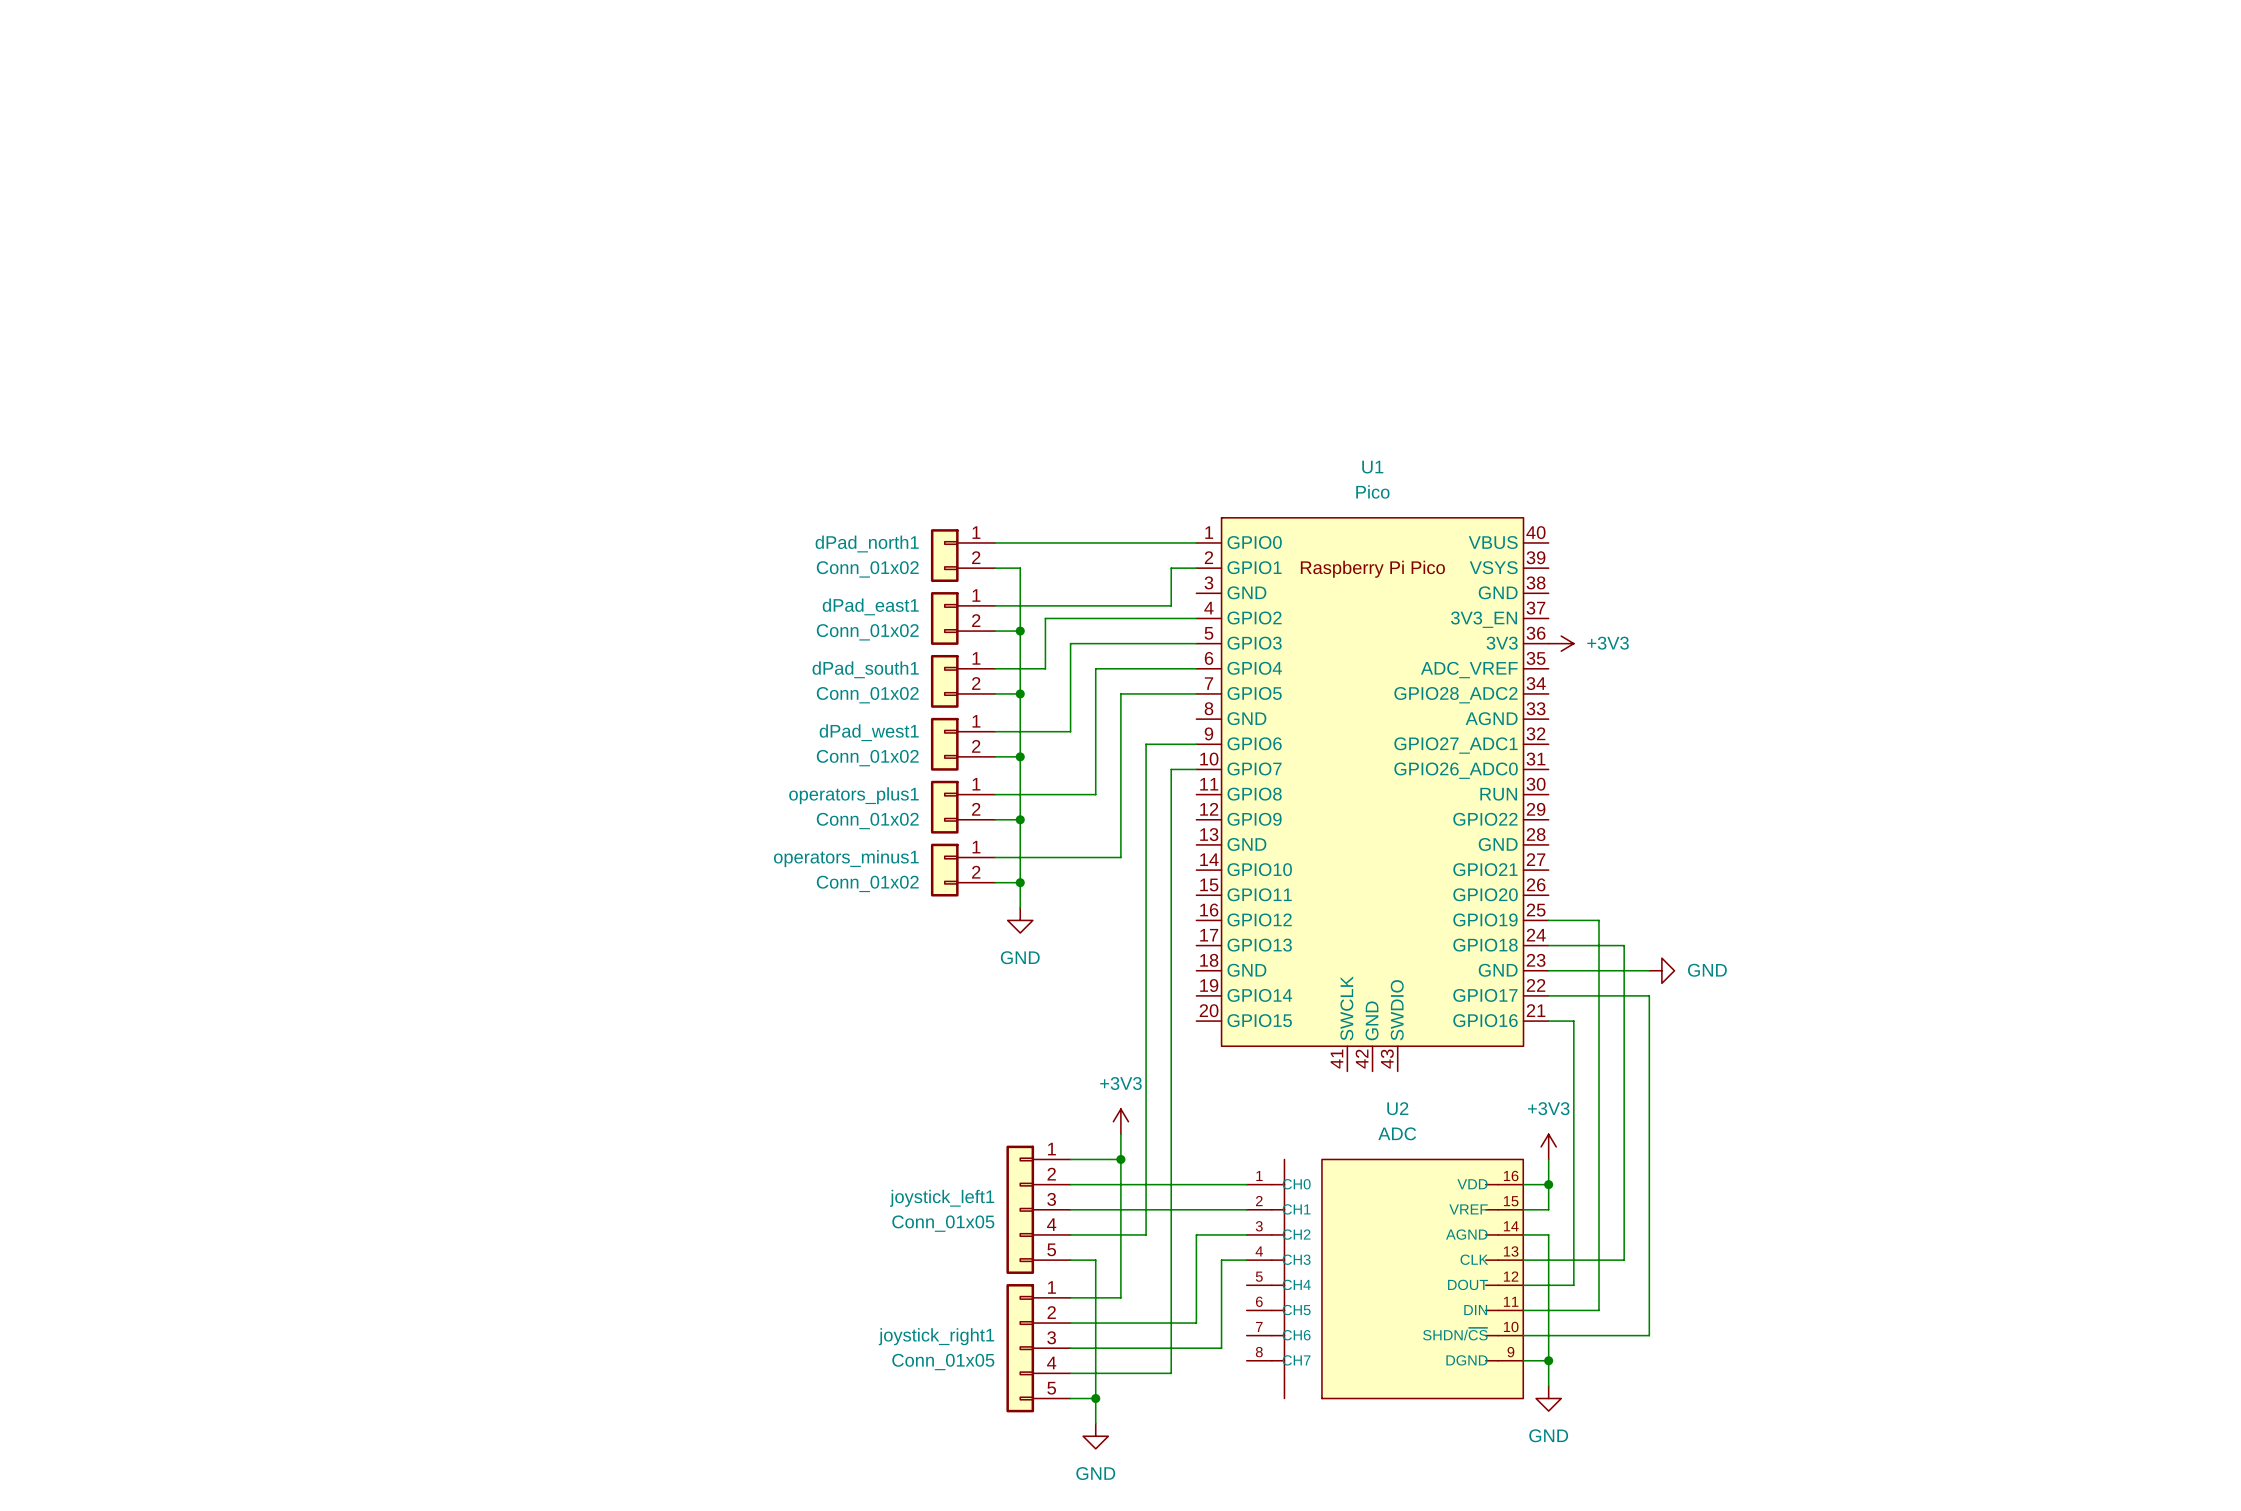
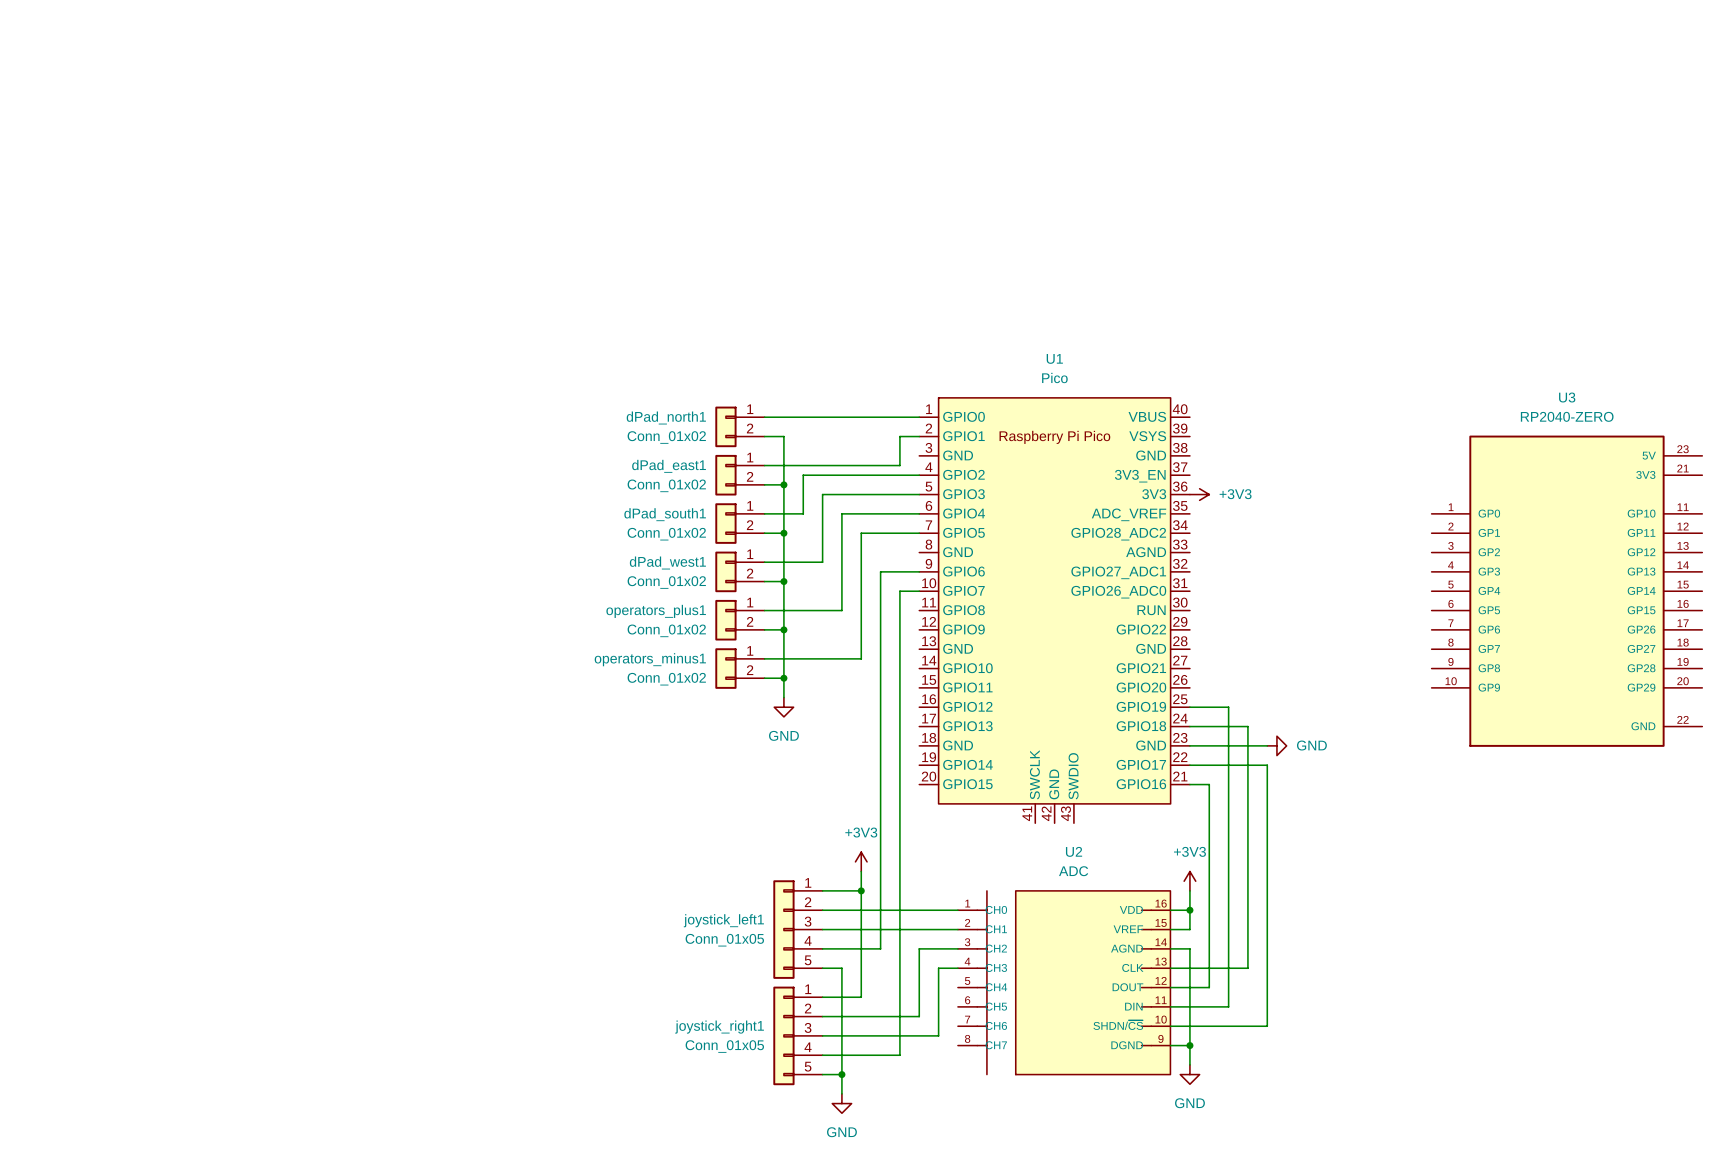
U3: none -> RP2040-ZERO (1566, 591)

